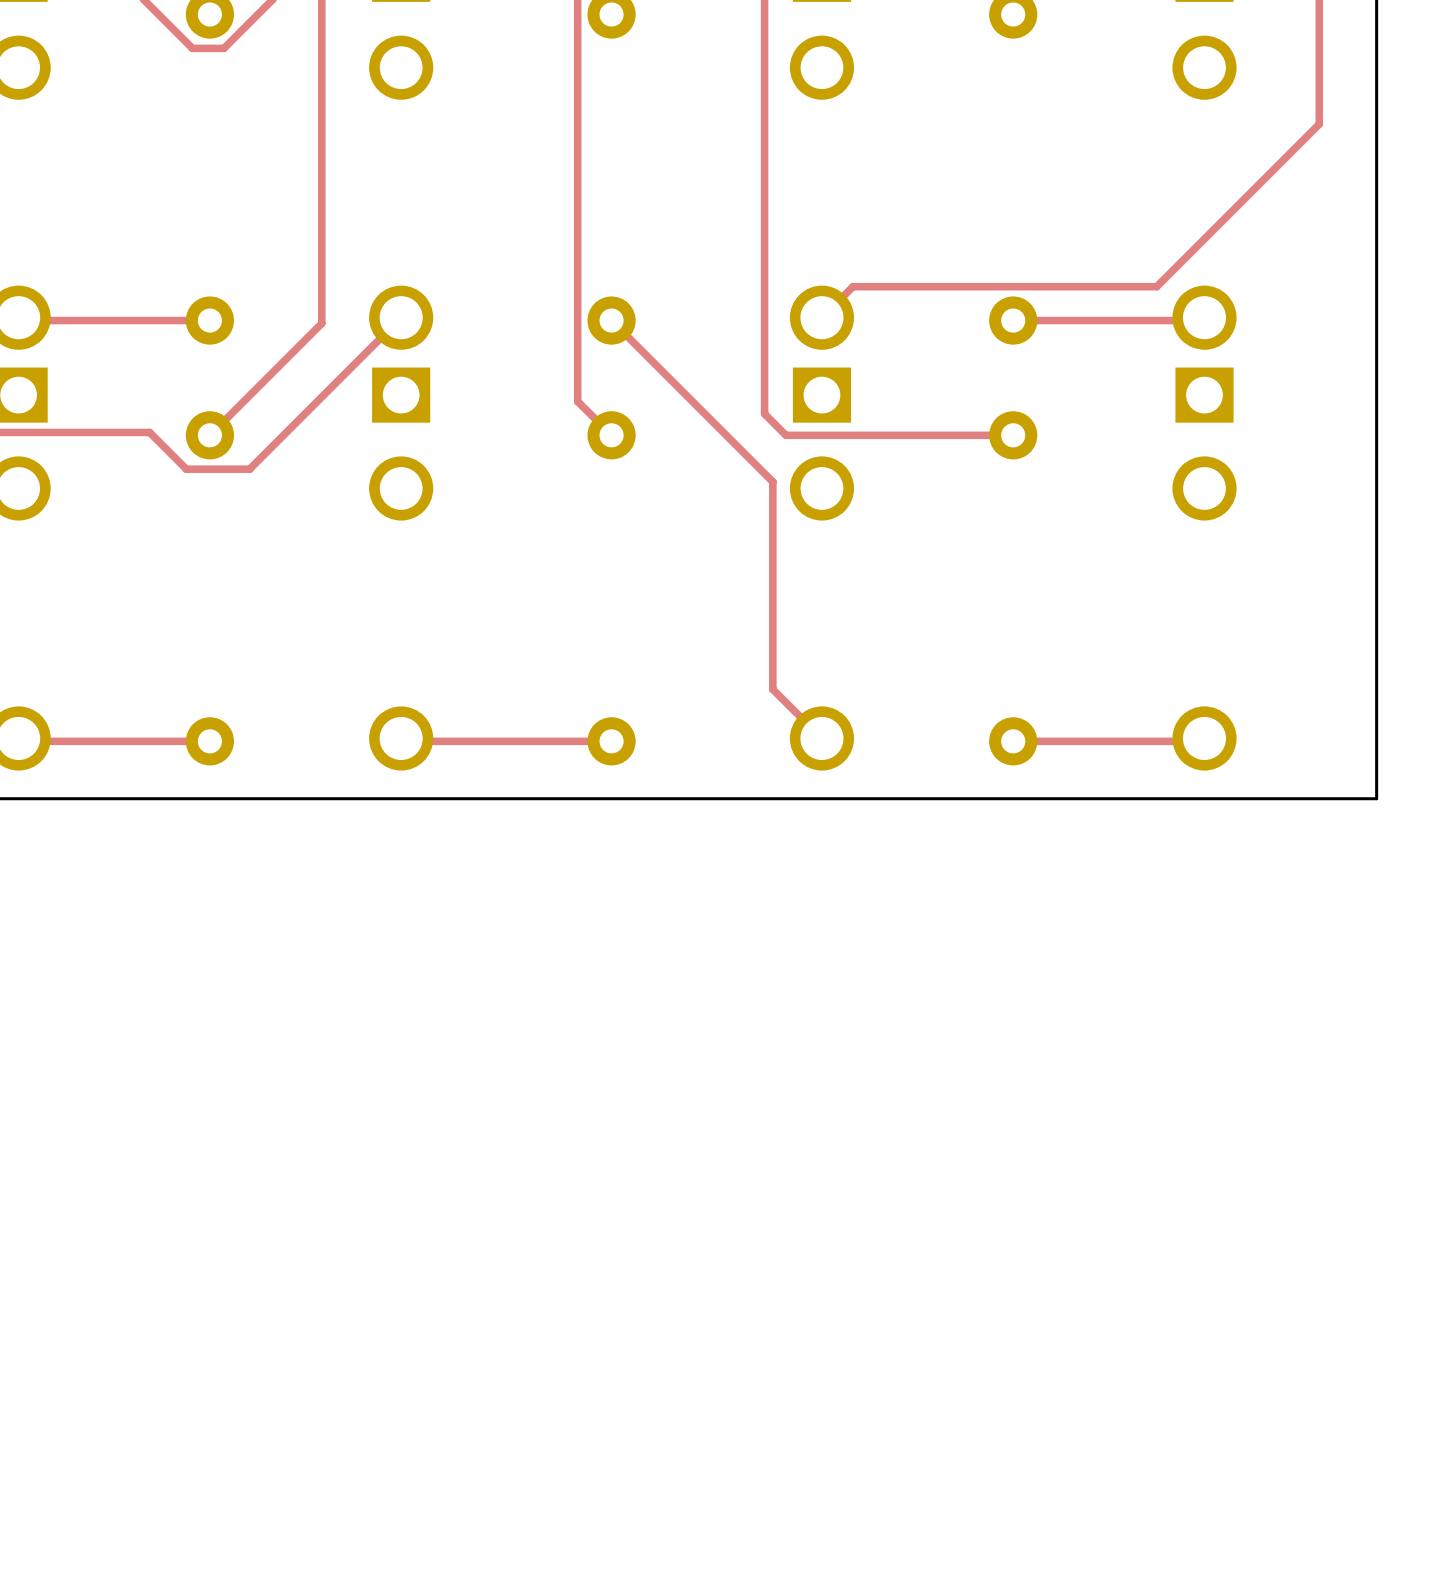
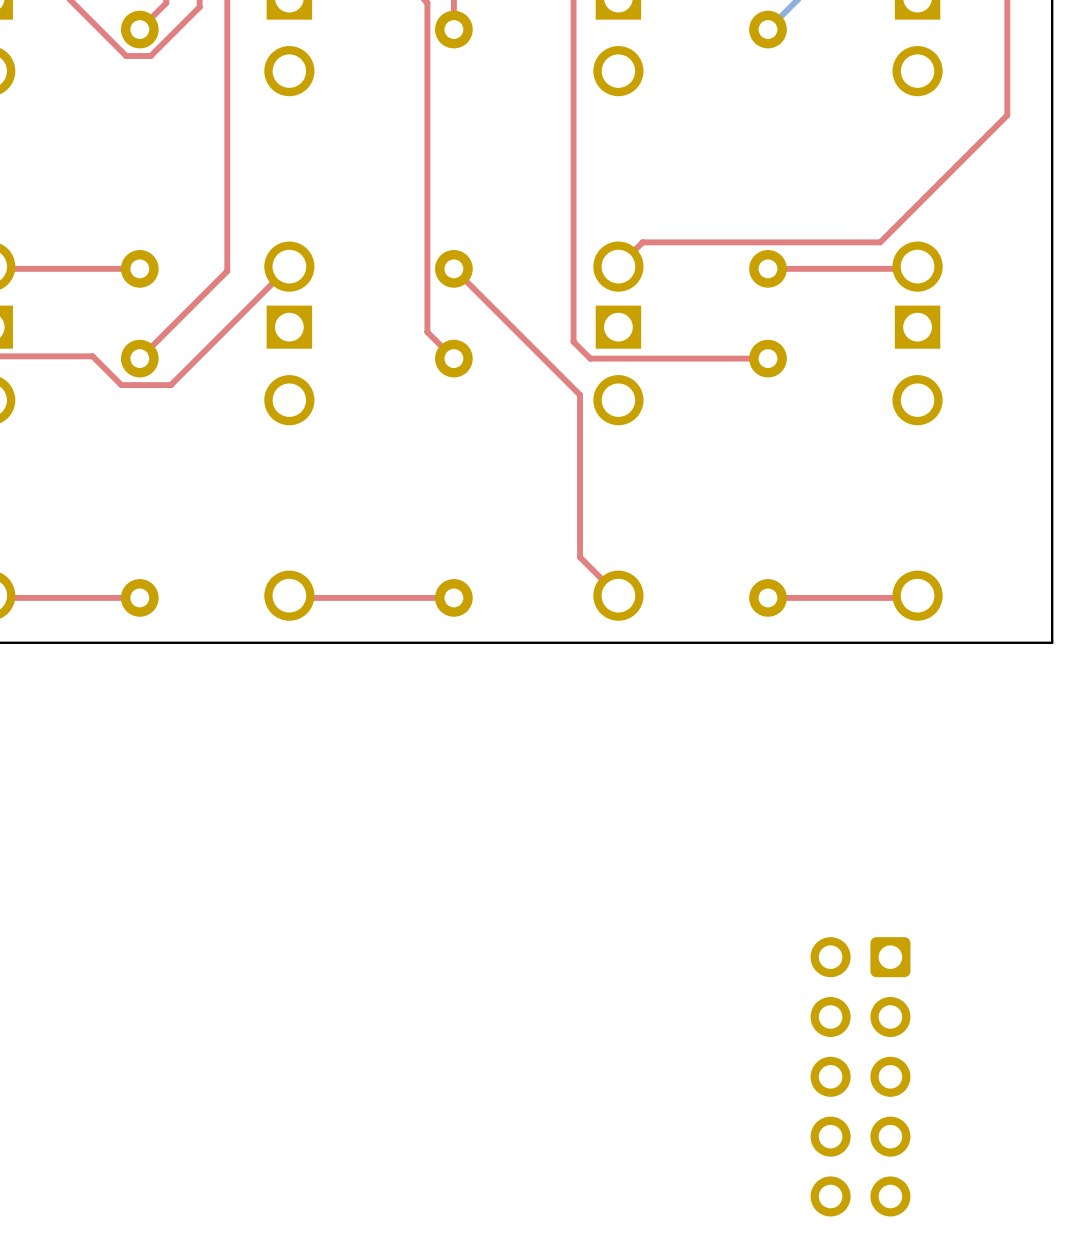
part: none -> (860, 1076)

